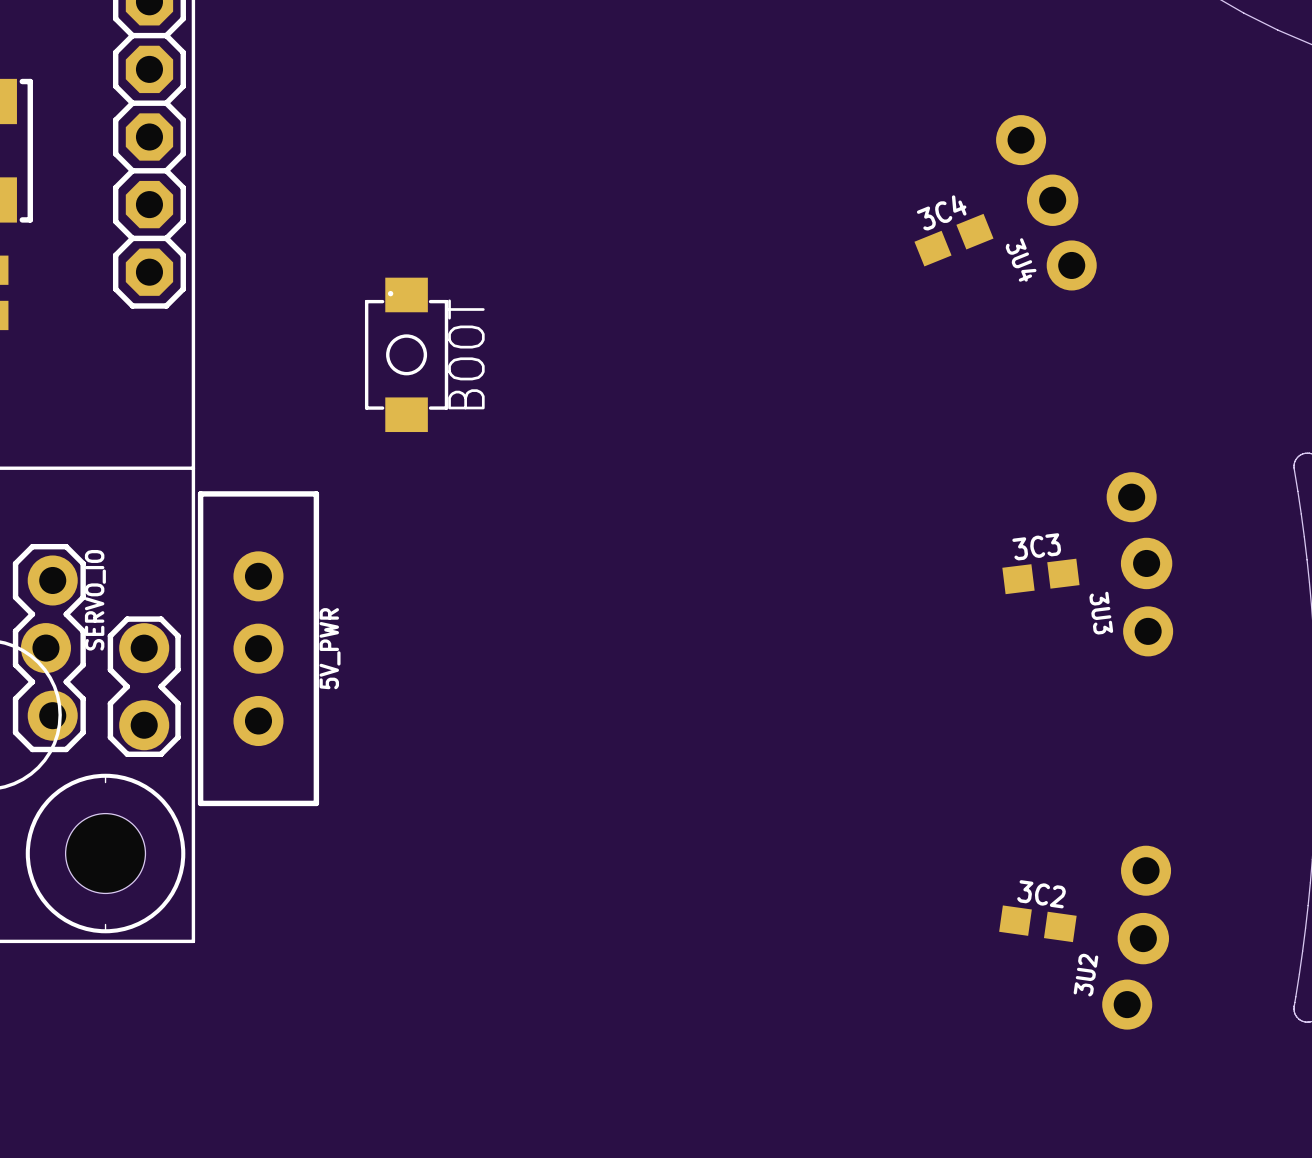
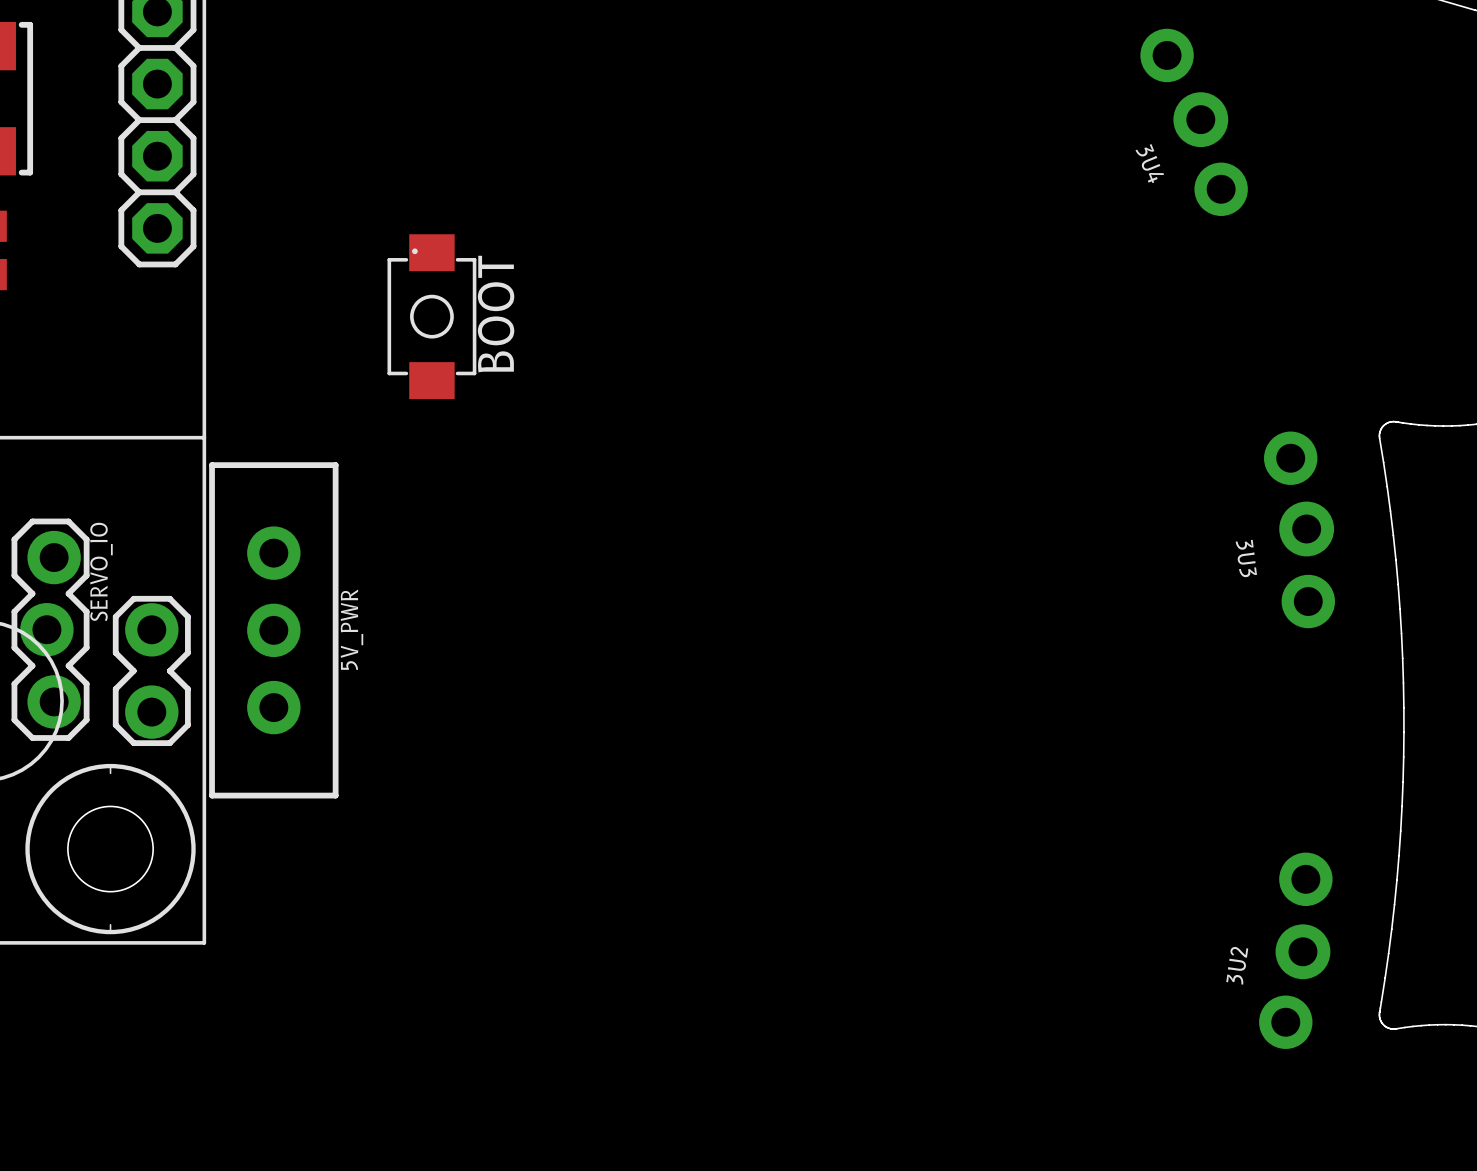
3U4 position: (1046, 202) -> (1194, 122)
3C4: (953, 240) -> none
3U4 name position: 3U4 (1021, 259) -> 3U4 (1149, 163)
3U3 position: (1139, 564) -> (1299, 529)
3C3: (1040, 576) -> none
3U3 name position: 3U3 (1101, 613) -> 3U3 (1246, 558)
3C2: (1037, 923) -> none
3U2 position: (1136, 937) -> (1295, 950)
3U2 name position: 3U2 (1085, 975) -> 3U2 (1237, 965)

